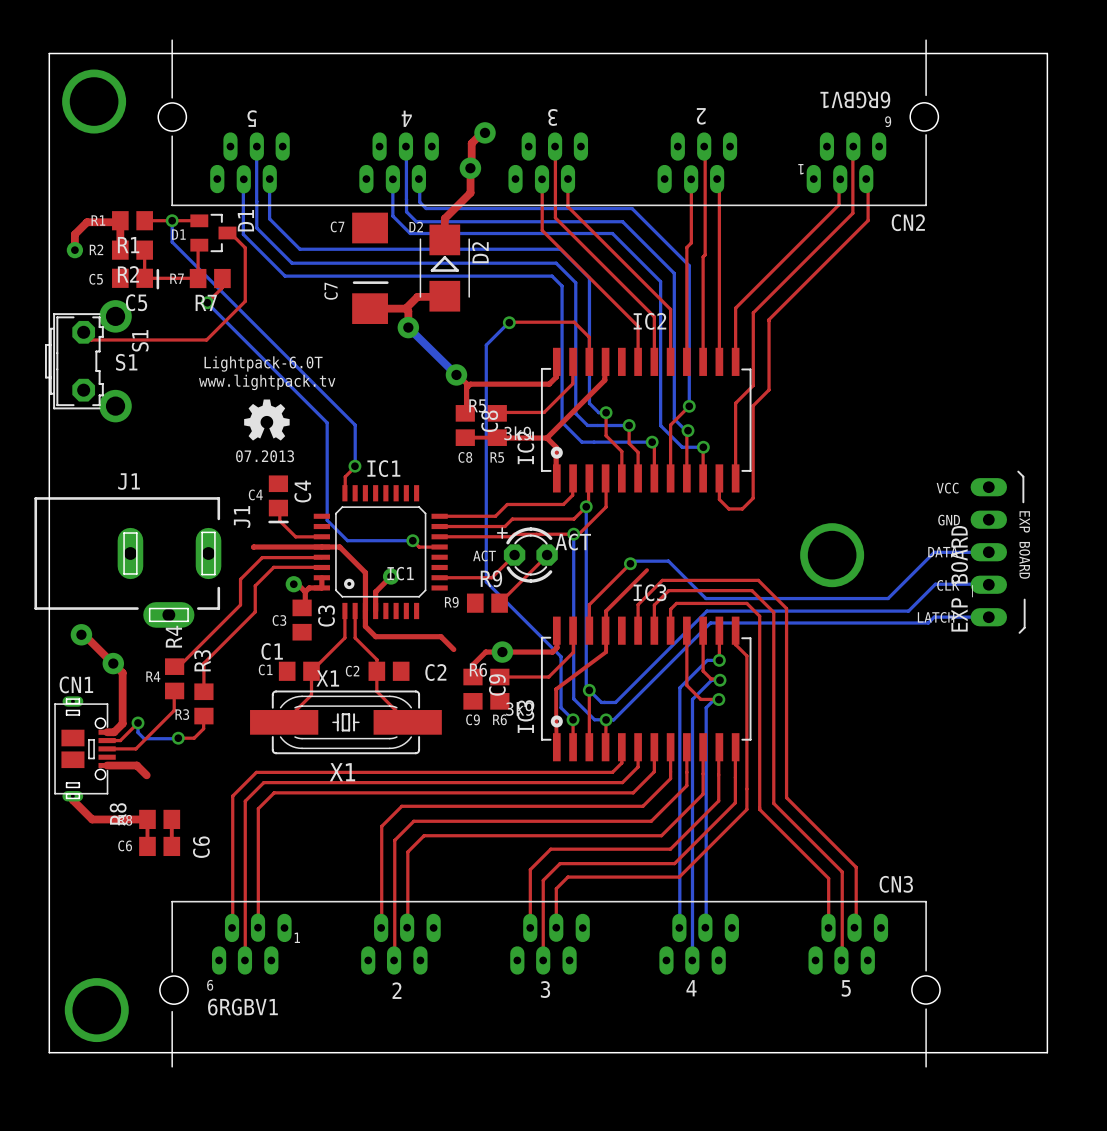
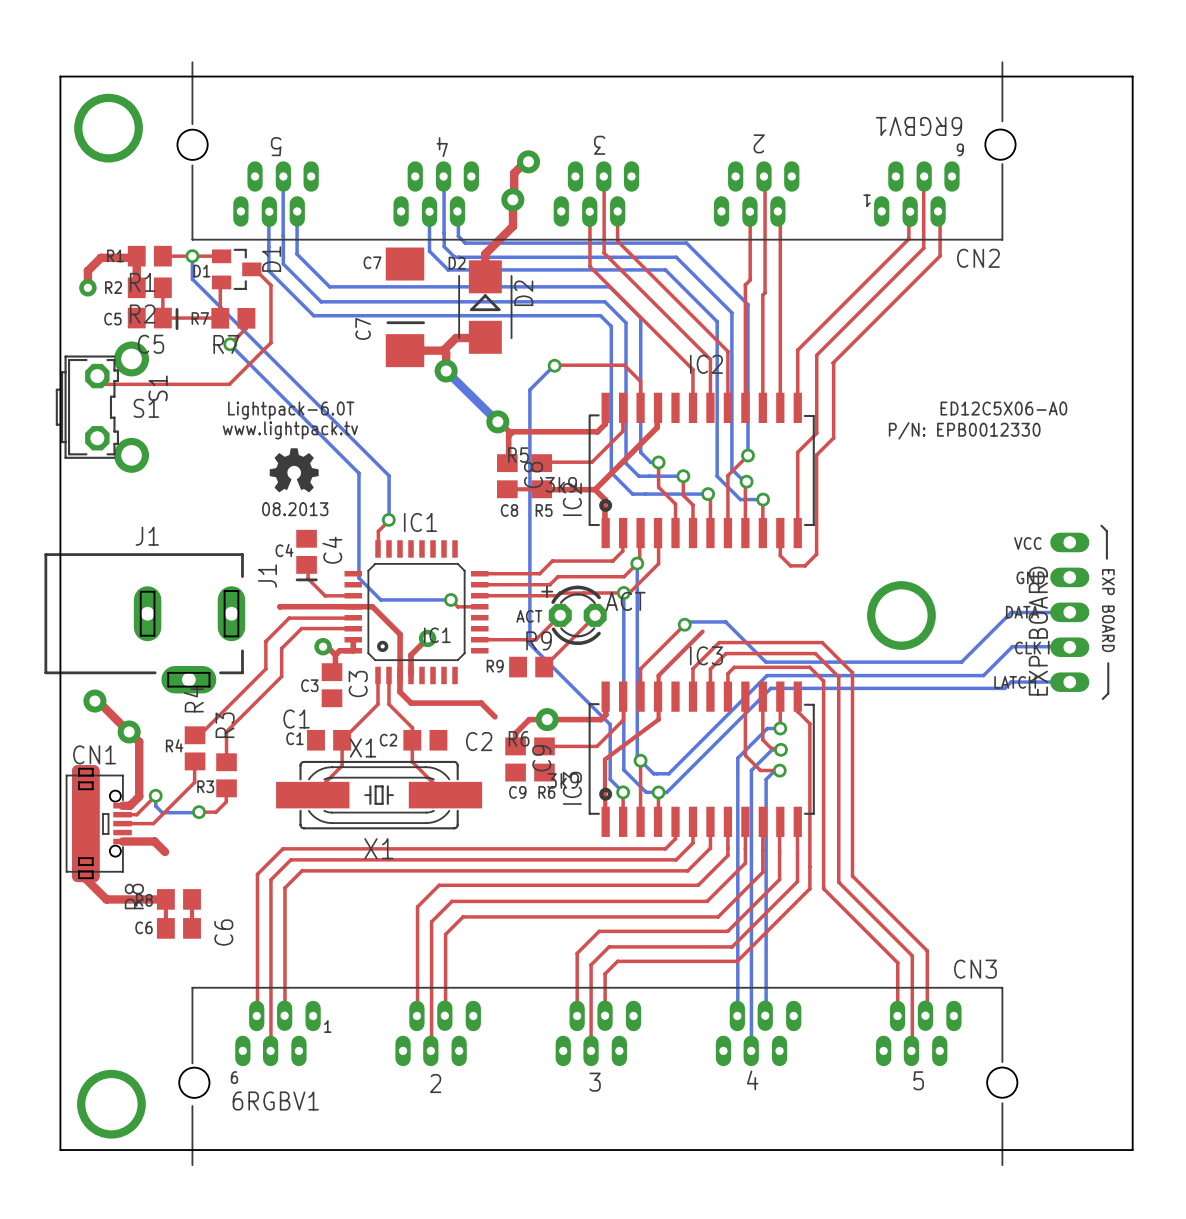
text: none -> ED12C5X06-A0 (1003, 408)
text: none -> P/N: EPB0012330 (964, 430)
text: 07.2013 (265, 456) -> 08.2013 (295, 509)
part footprint: [54, 696, 116, 802] -> [65, 765, 132, 883]

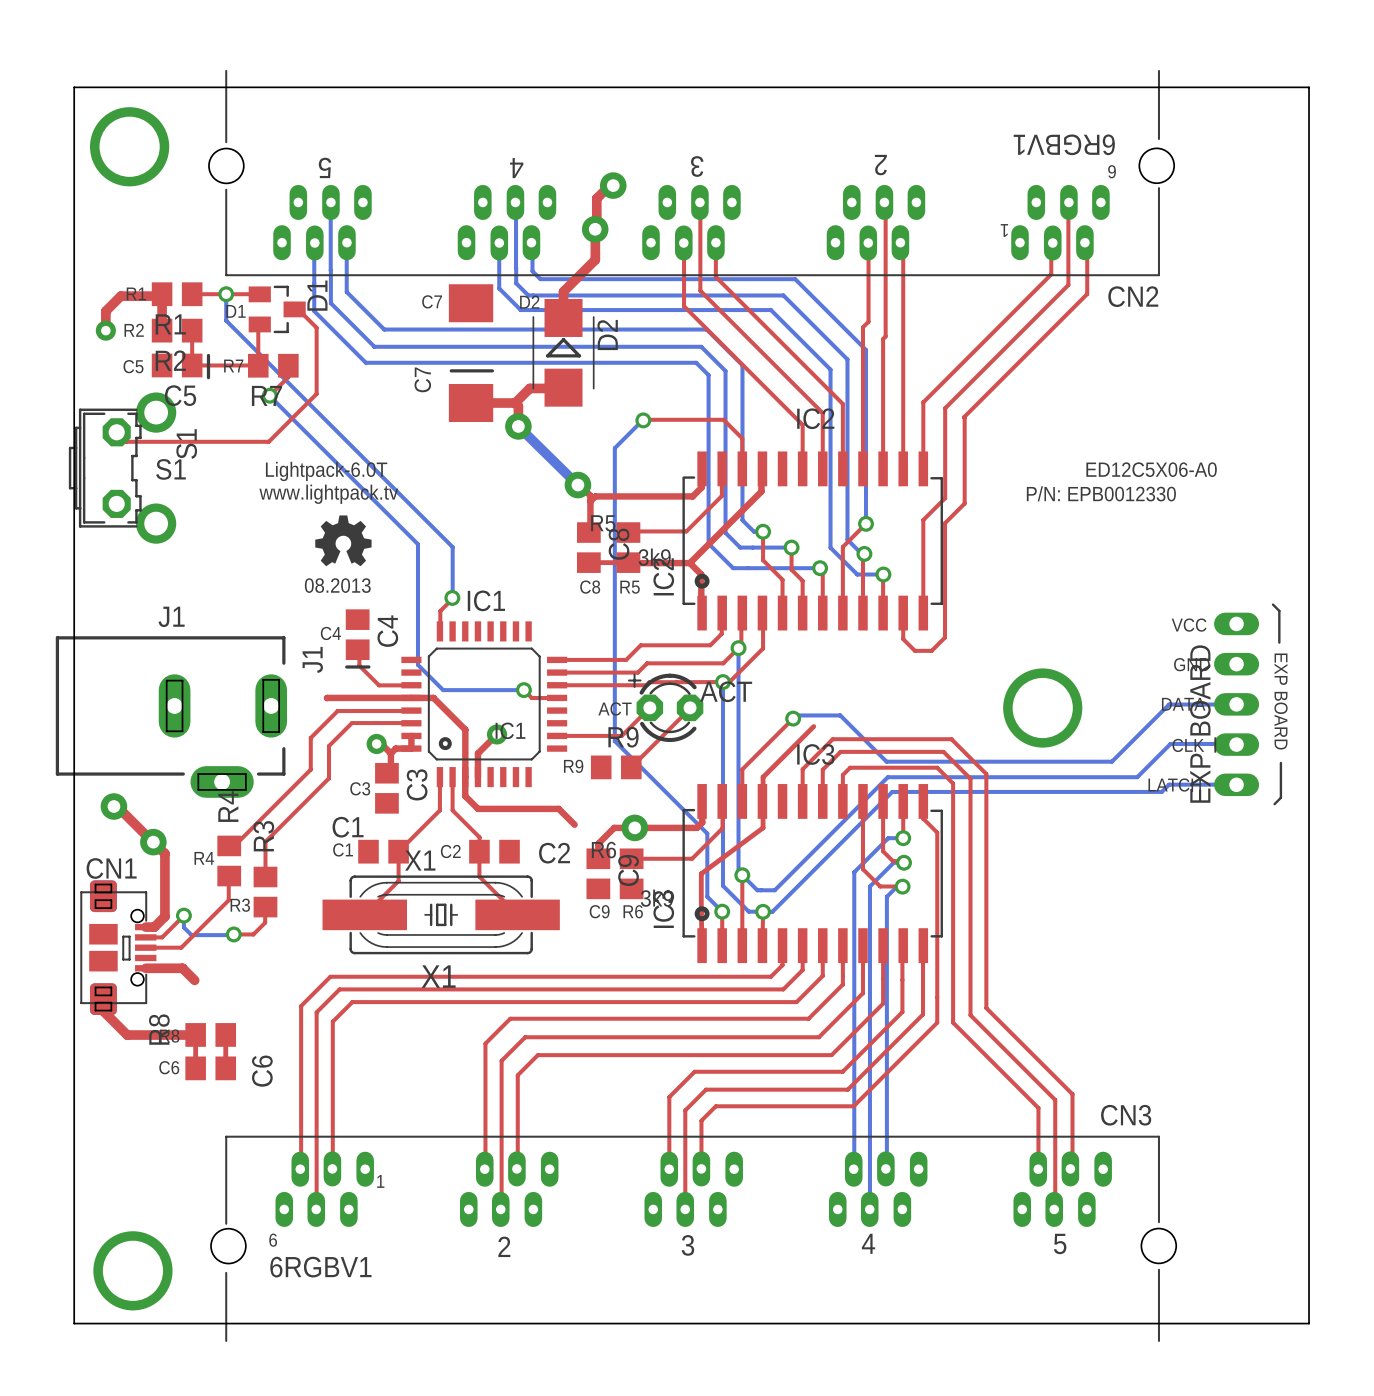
part footprint: [65, 765, 132, 883] -> [80, 880, 157, 1016]

